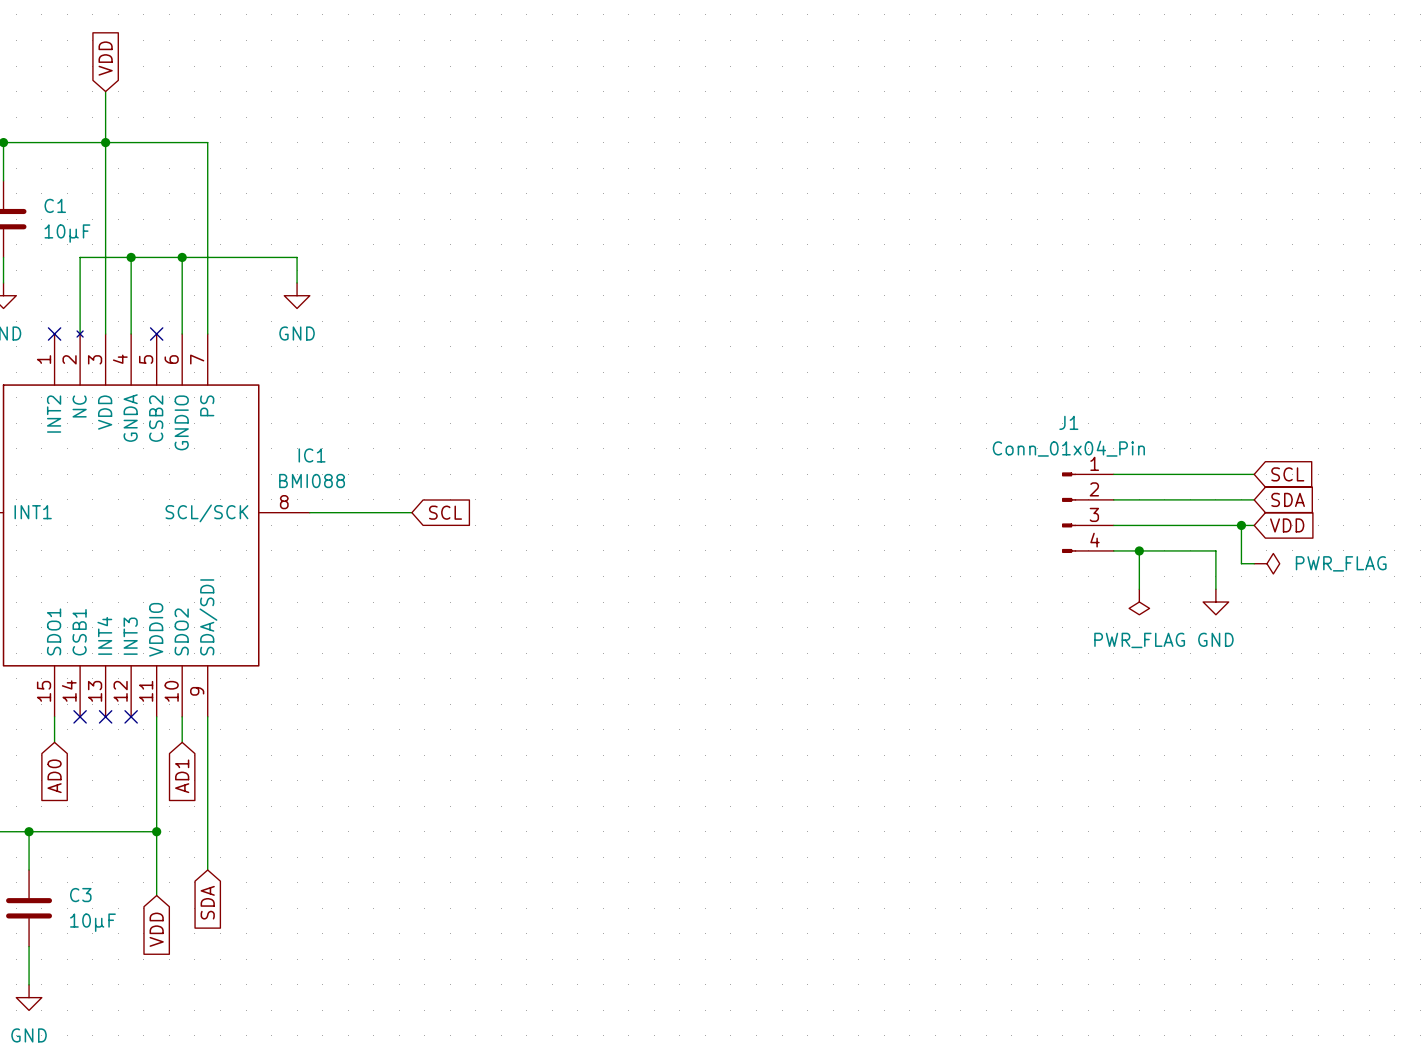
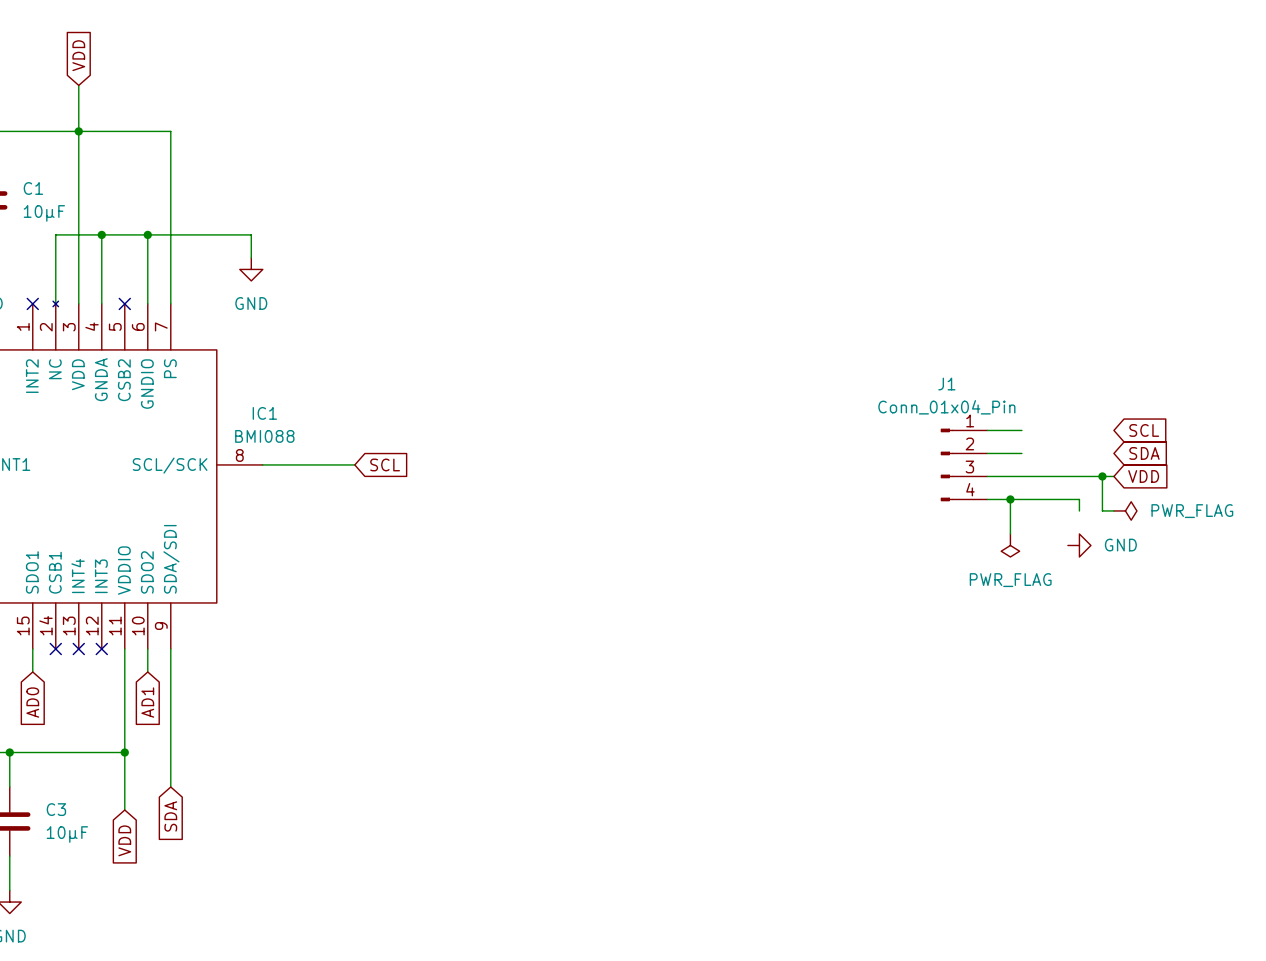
wire: (1152, 474) (1254, 474) -> none
wire: (1152, 499) (1254, 499) -> none
wire: (1215, 563) (1215, 589) -> none
power symbol rotation: 0° (1215, 602) -> 90° counterclockwise (1079, 545)

